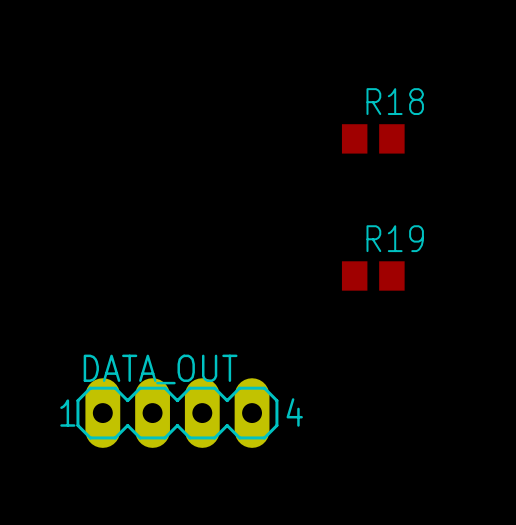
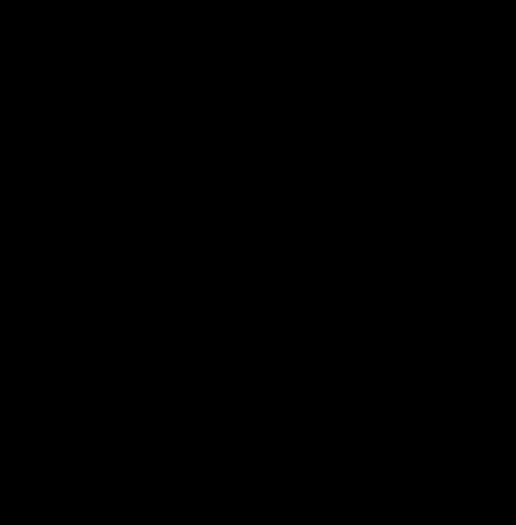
R18: (373, 138) -> none
R19: (373, 275) -> none
DATA_OUT: (177, 413) -> none

